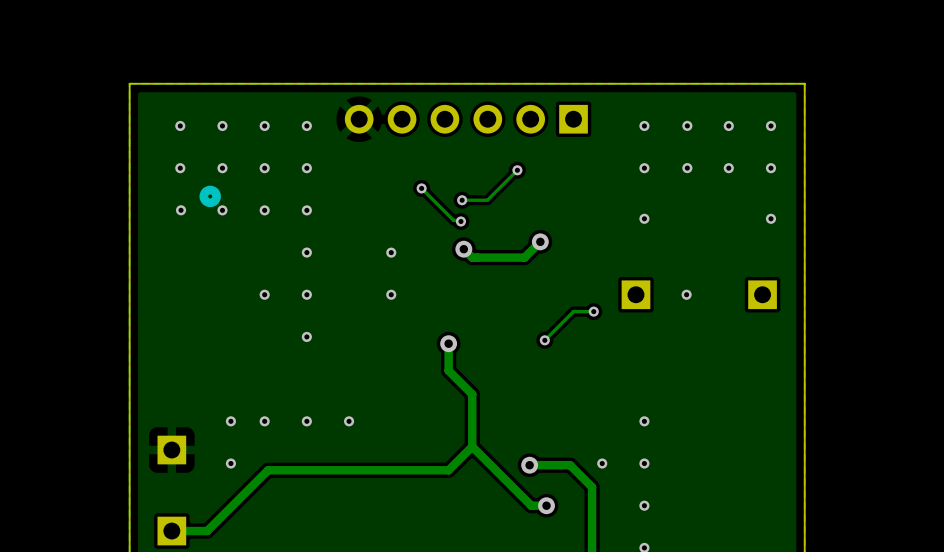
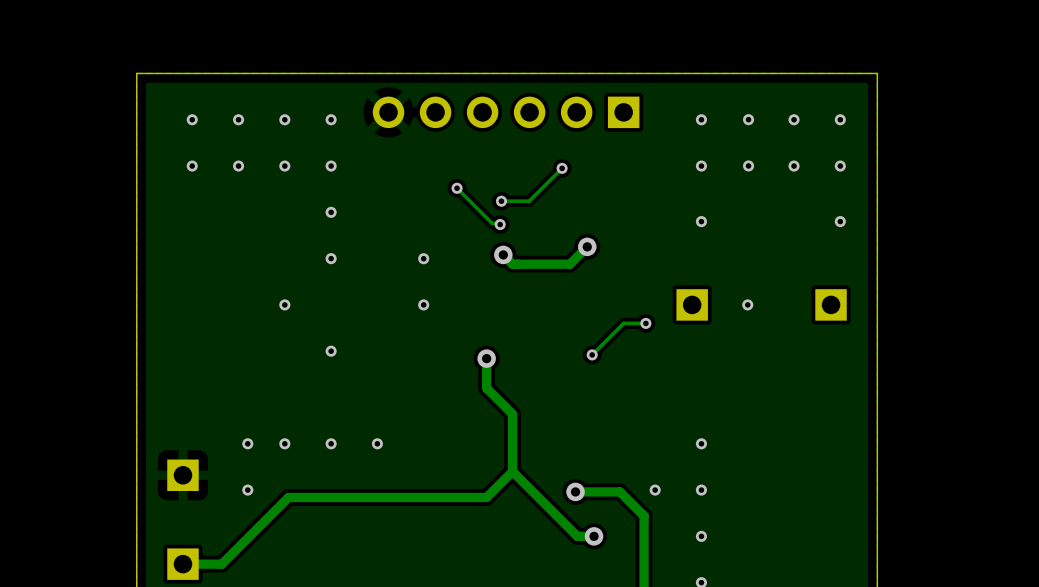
part: (210, 196) -> none
via: (181, 210) -> none
via: (222, 210) -> none
via: (264, 210) -> none
via: (306, 294) -> none

